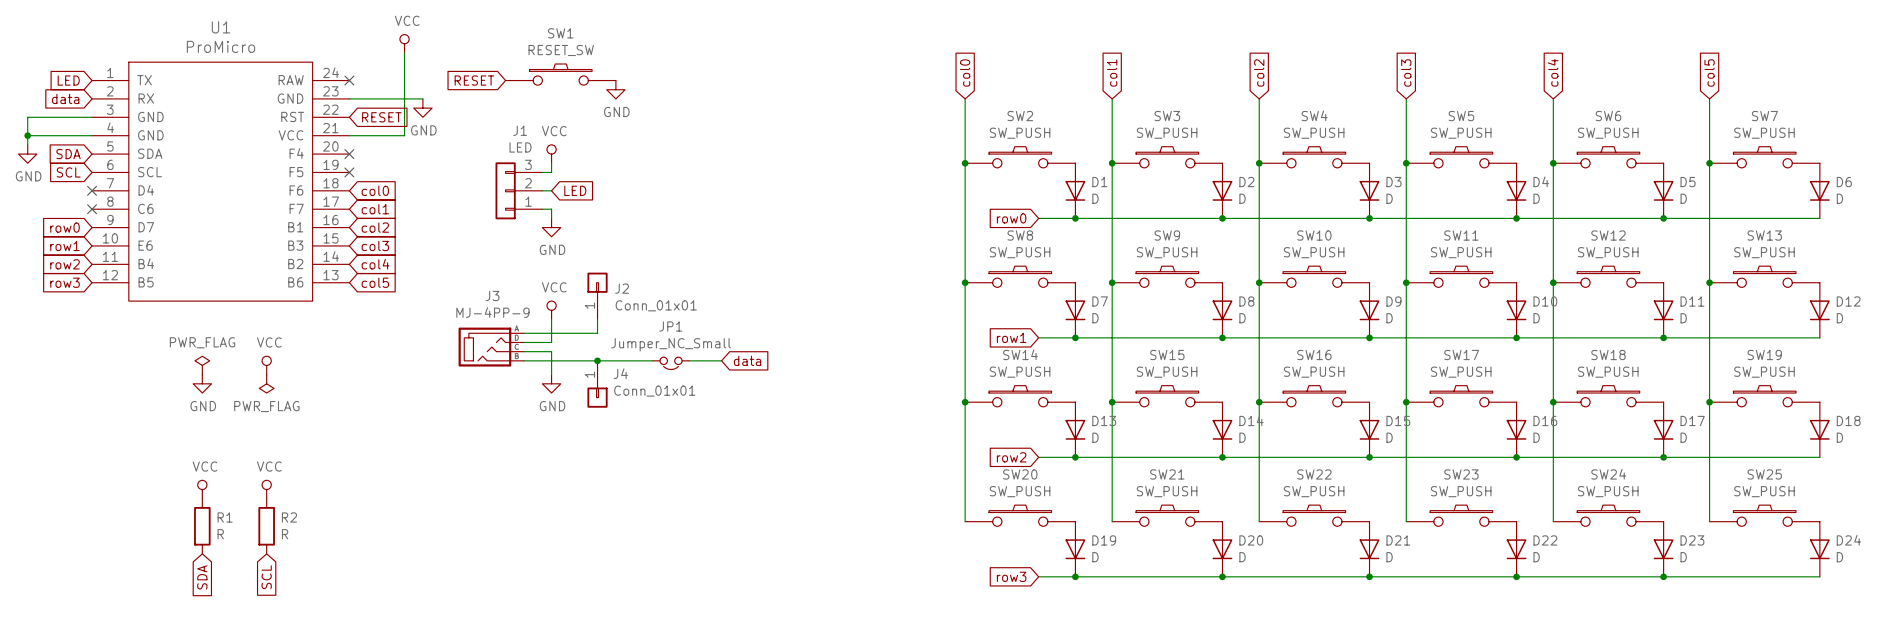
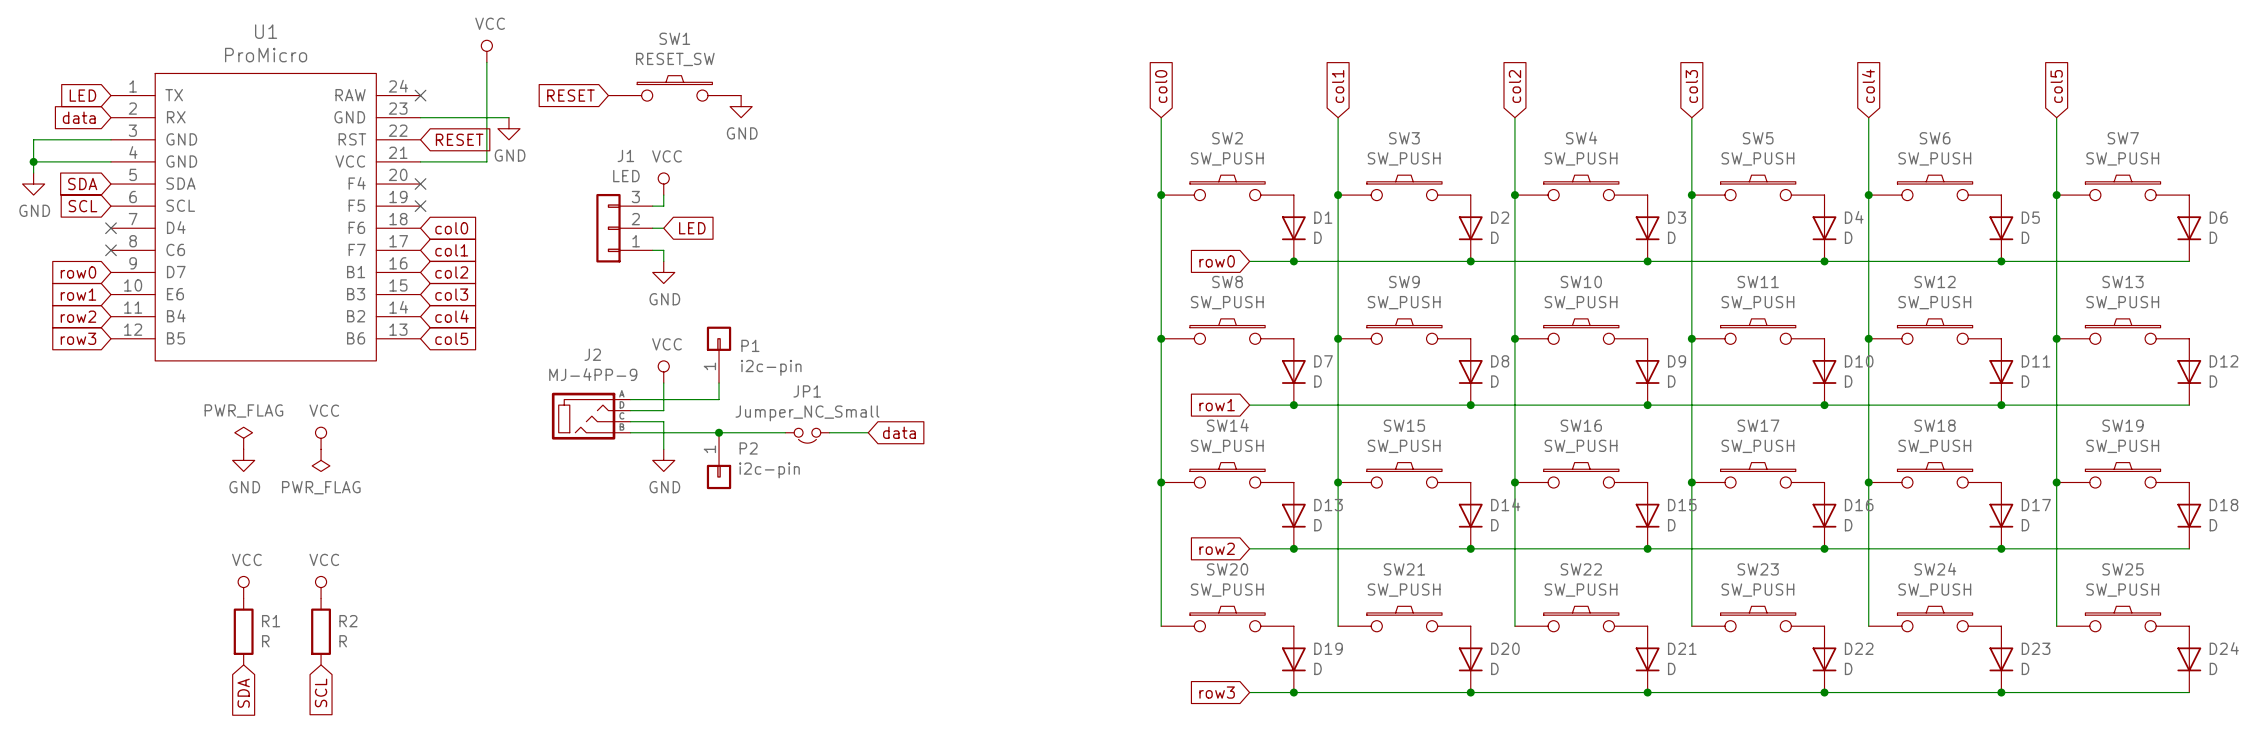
J2 name: J2 (622, 288) -> P1 (750, 345)
J3 name: J3 (492, 295) -> J2 (592, 354)
J2 value: Conn_01x01 (656, 305) -> i2c-pin (771, 367)
J4 name: J4 (620, 373) -> P2 (748, 448)
J4 value: Conn_01x01 (654, 391) -> i2c-pin (769, 470)

